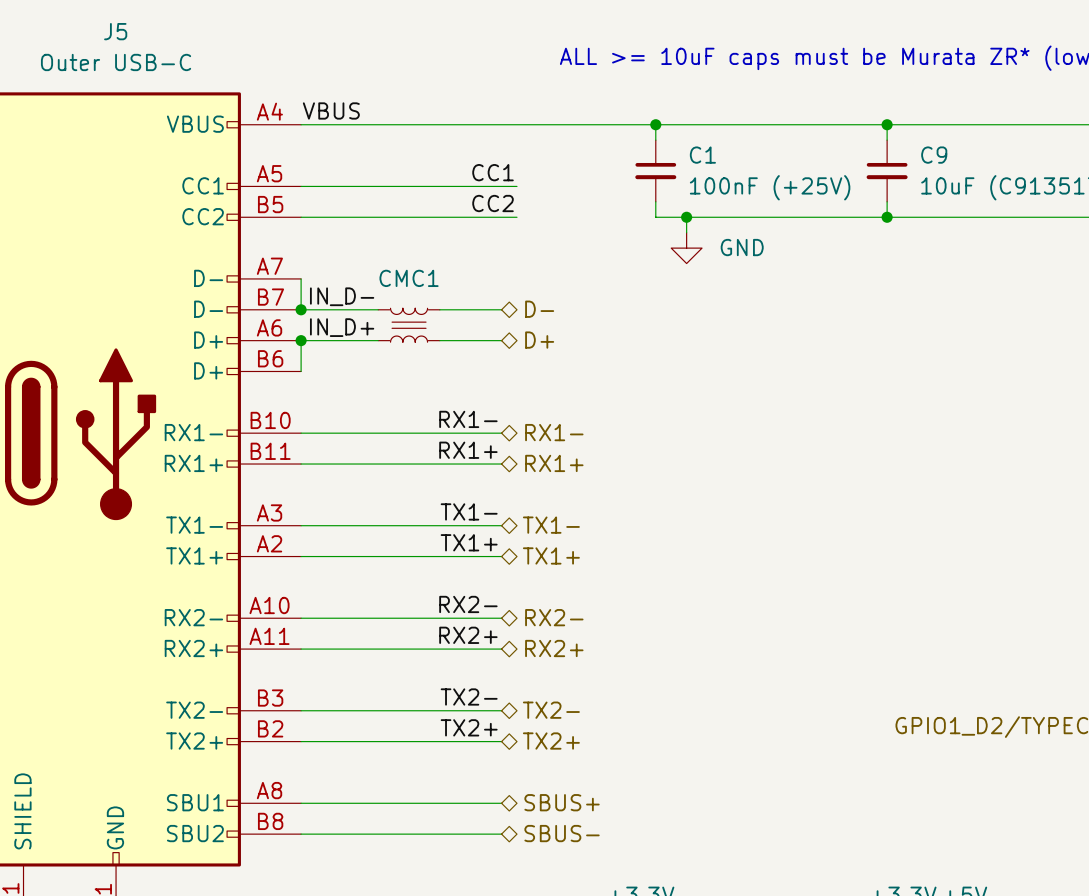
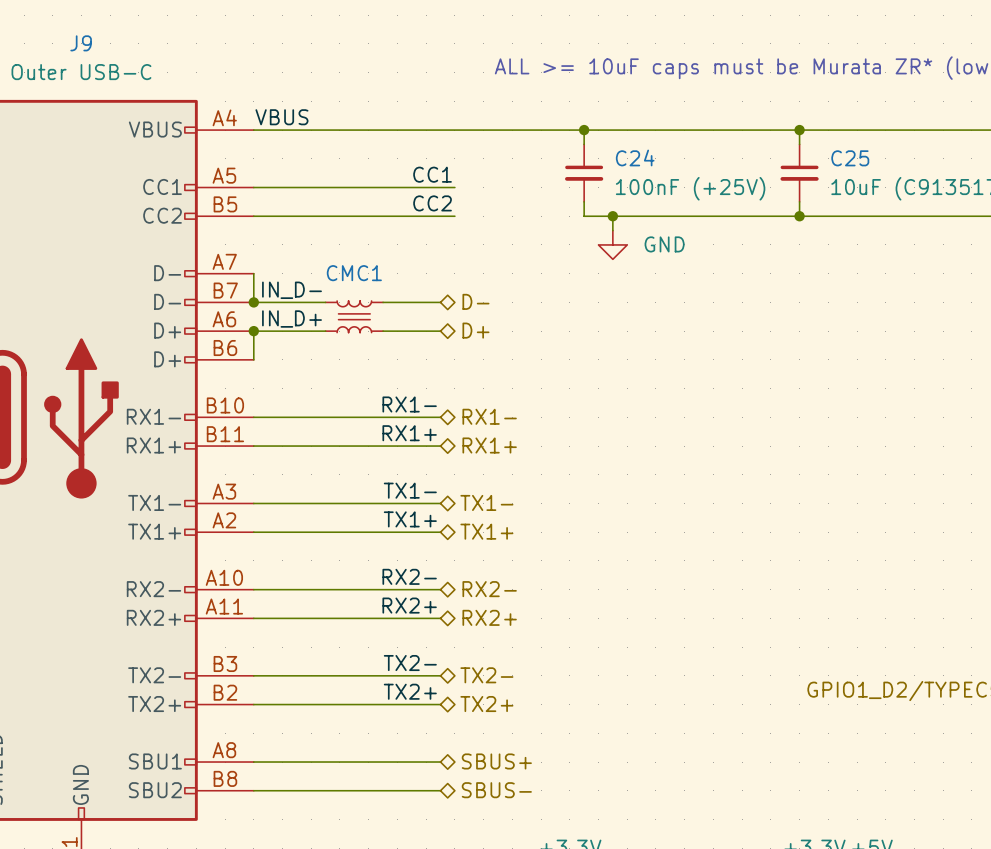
J5 name: J5 (115, 31) -> J9 (81, 43)
C1 name: C1 (702, 155) -> C24 (635, 157)
C9 name: C9 (934, 155) -> C25 (850, 158)

